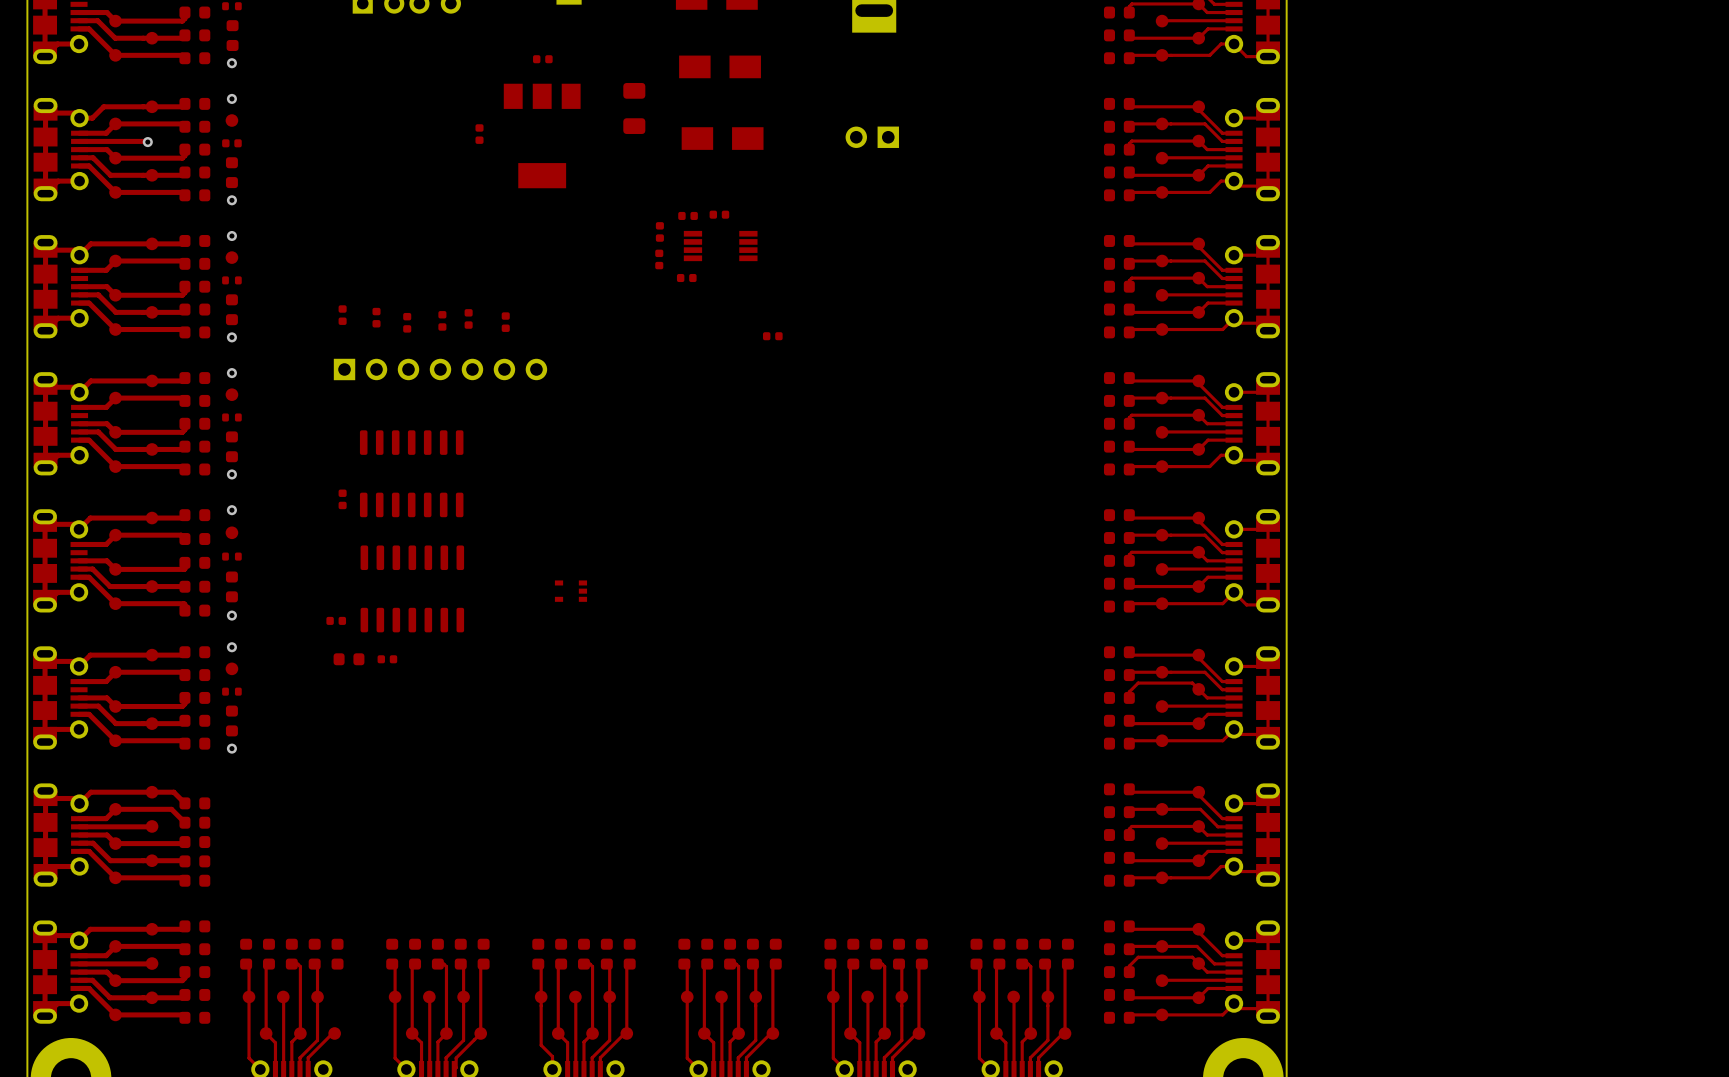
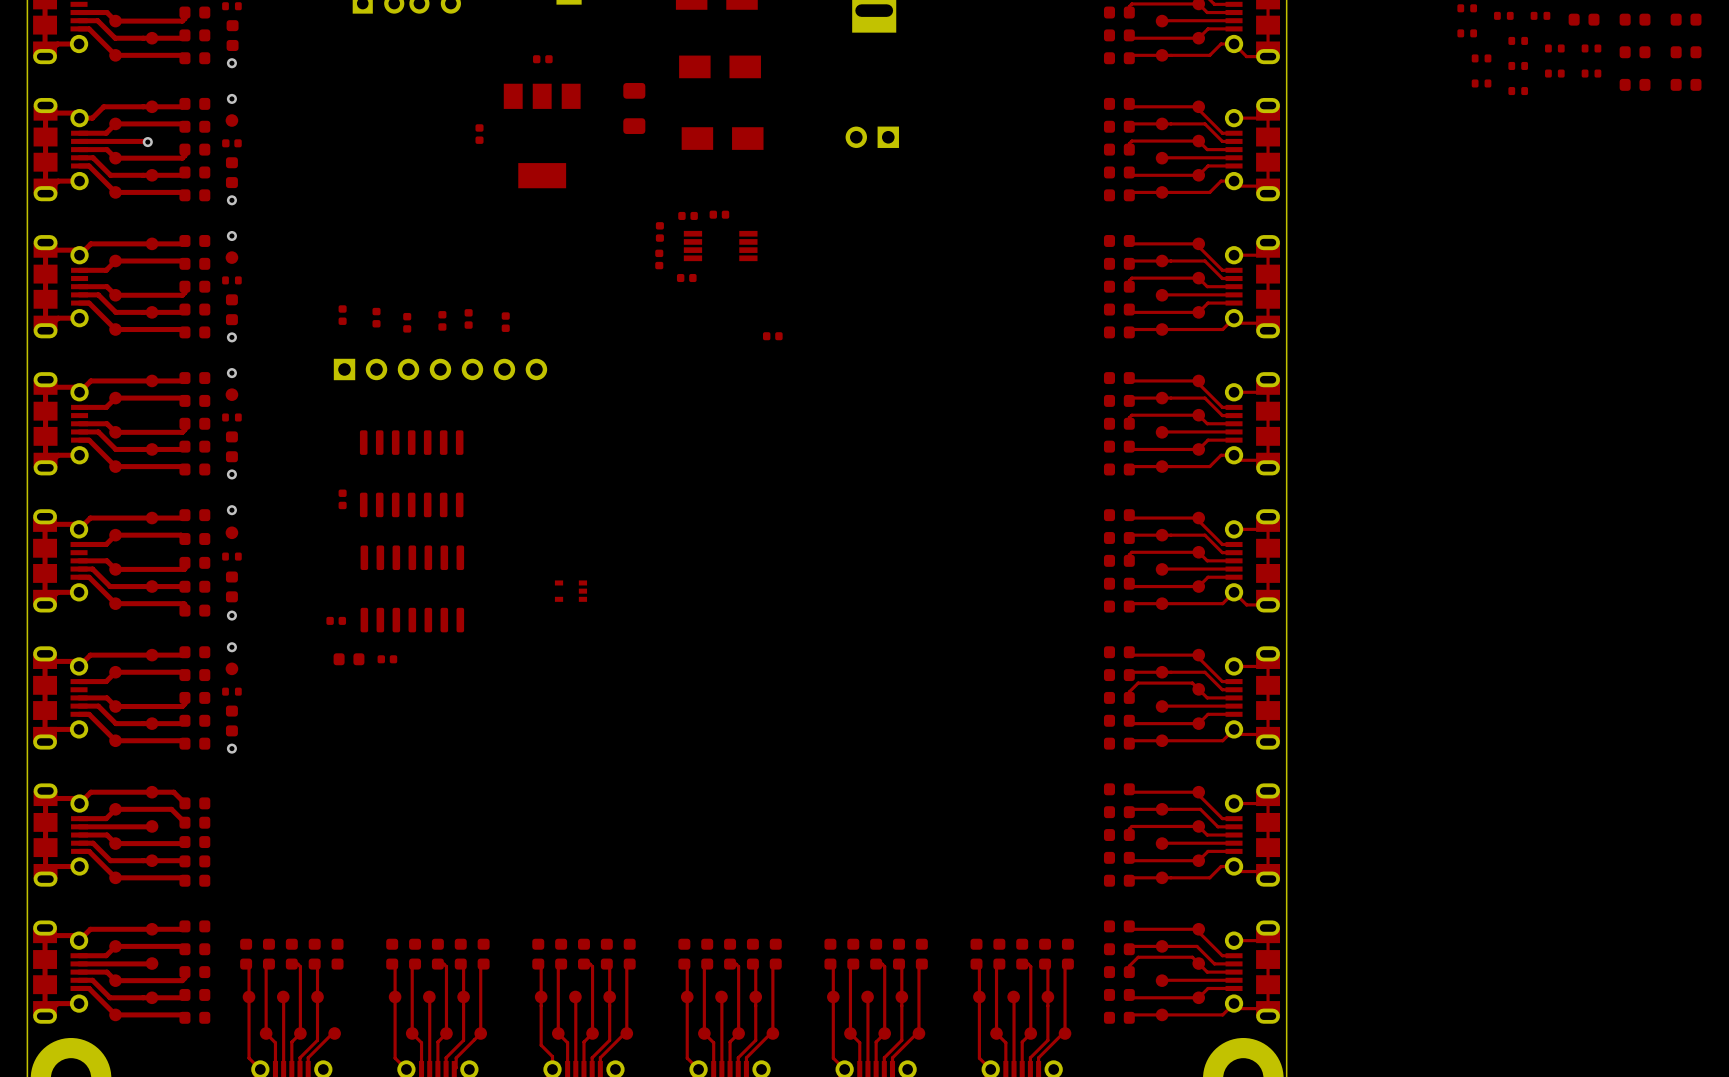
part: none -> (1467, 8)
part: none -> (1503, 15)
part: none -> (1540, 15)
part: none -> (1584, 19)
part: none -> (1635, 19)
part: none -> (1686, 19)
part: none -> (1467, 33)
part: none -> (1518, 40)
part: none -> (1554, 48)
part: none -> (1591, 48)
part: none -> (1635, 52)
part: none -> (1686, 52)
part: none -> (1481, 58)
part: none -> (1518, 65)
part: none -> (1554, 73)
part: none -> (1591, 73)
part: none -> (1481, 83)
part: none -> (1635, 84)
part: none -> (1686, 84)
part: none -> (1518, 91)

